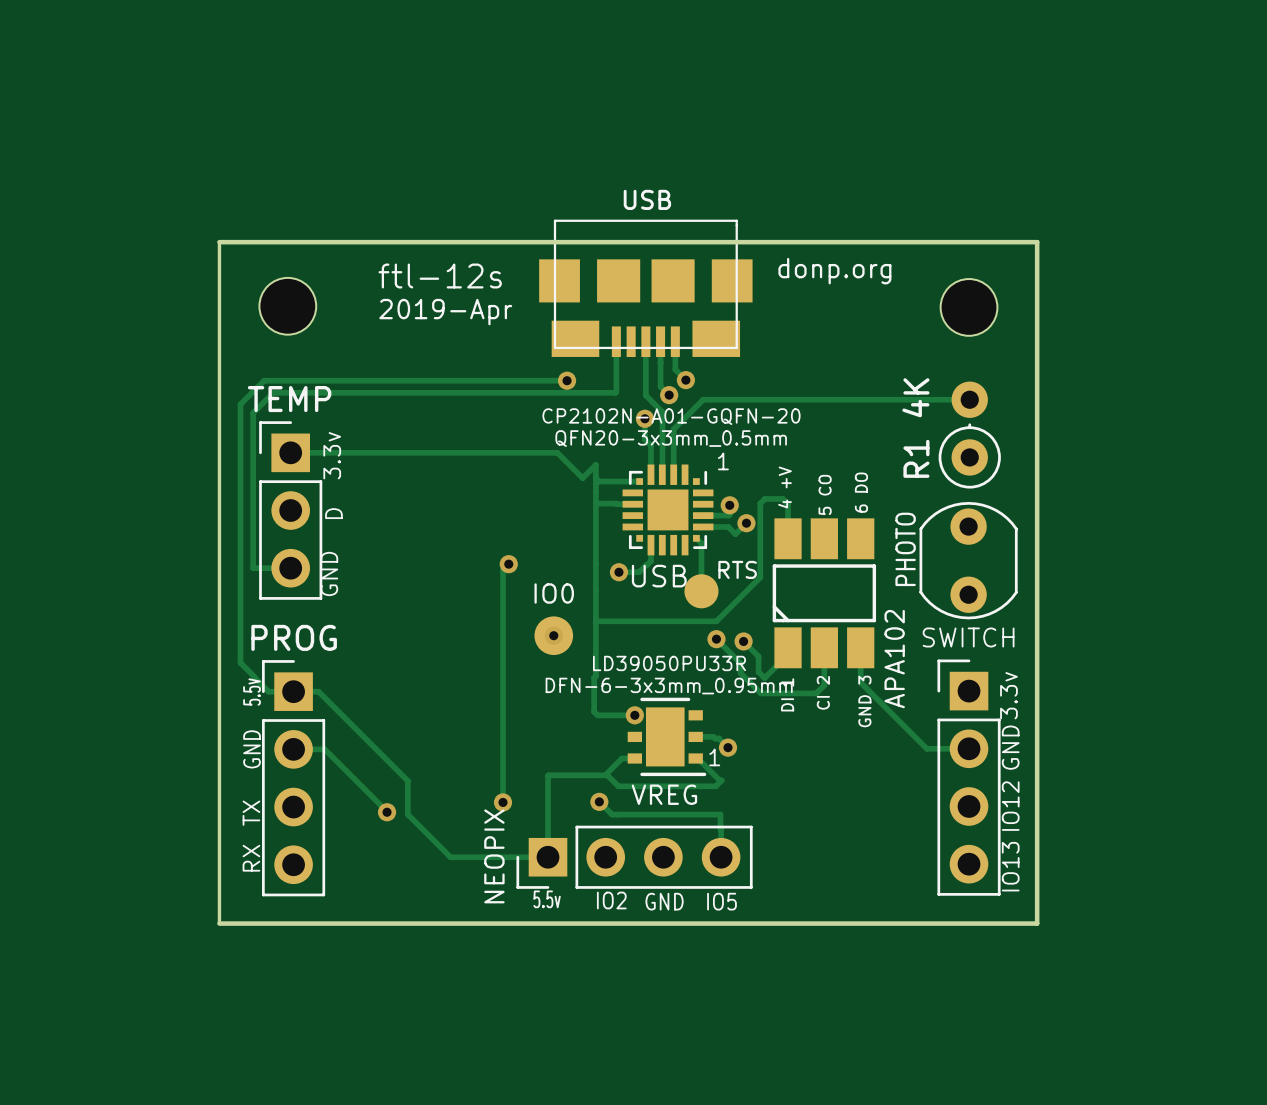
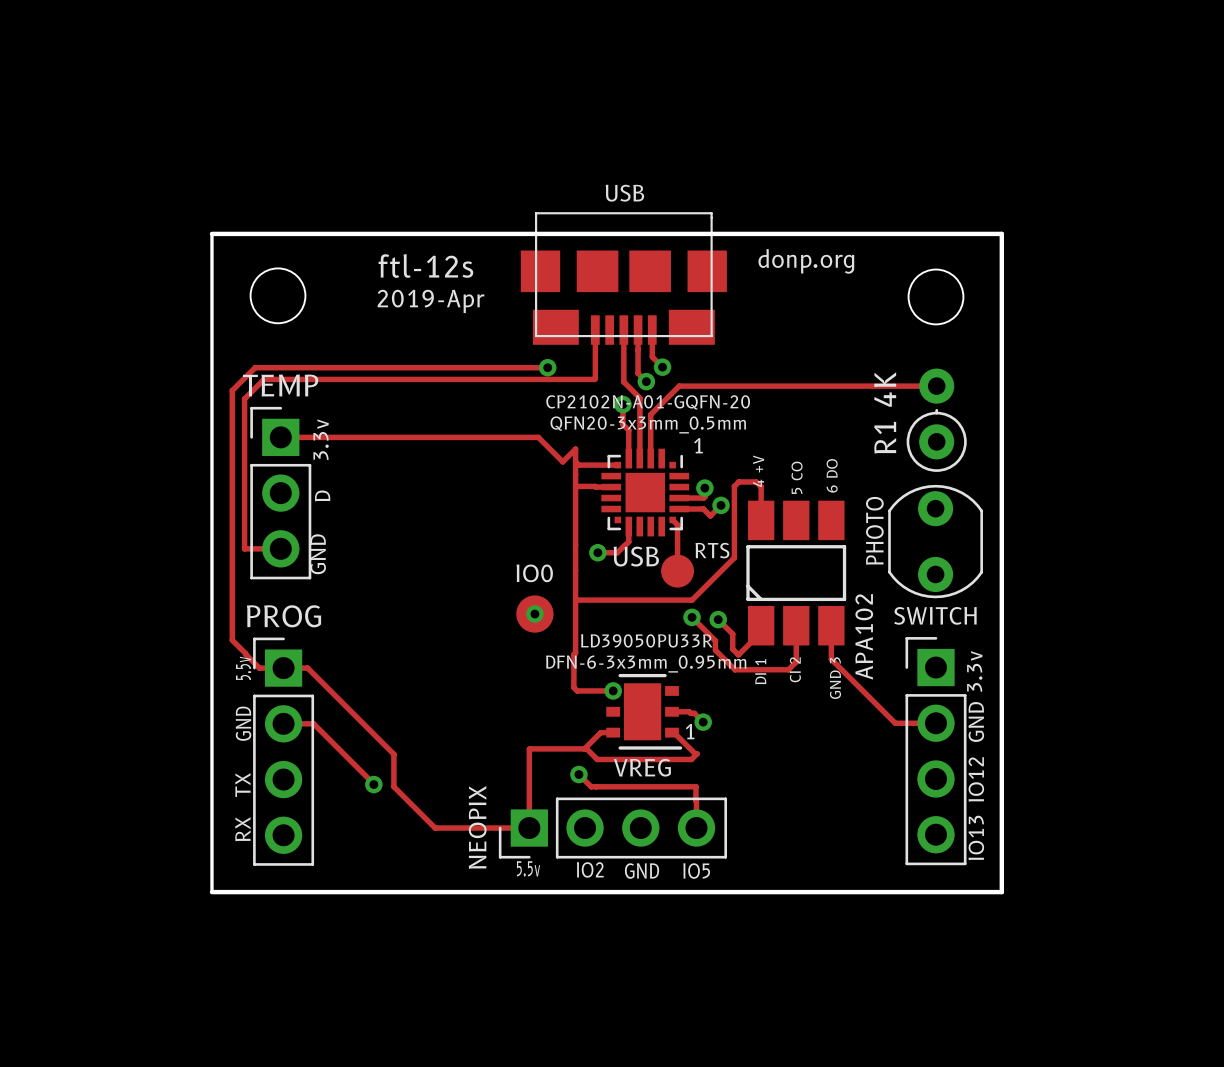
track: (508, 564) (503, 569) (503, 802) -> none
via: (508, 564) -> none
via: (503, 802) -> none

